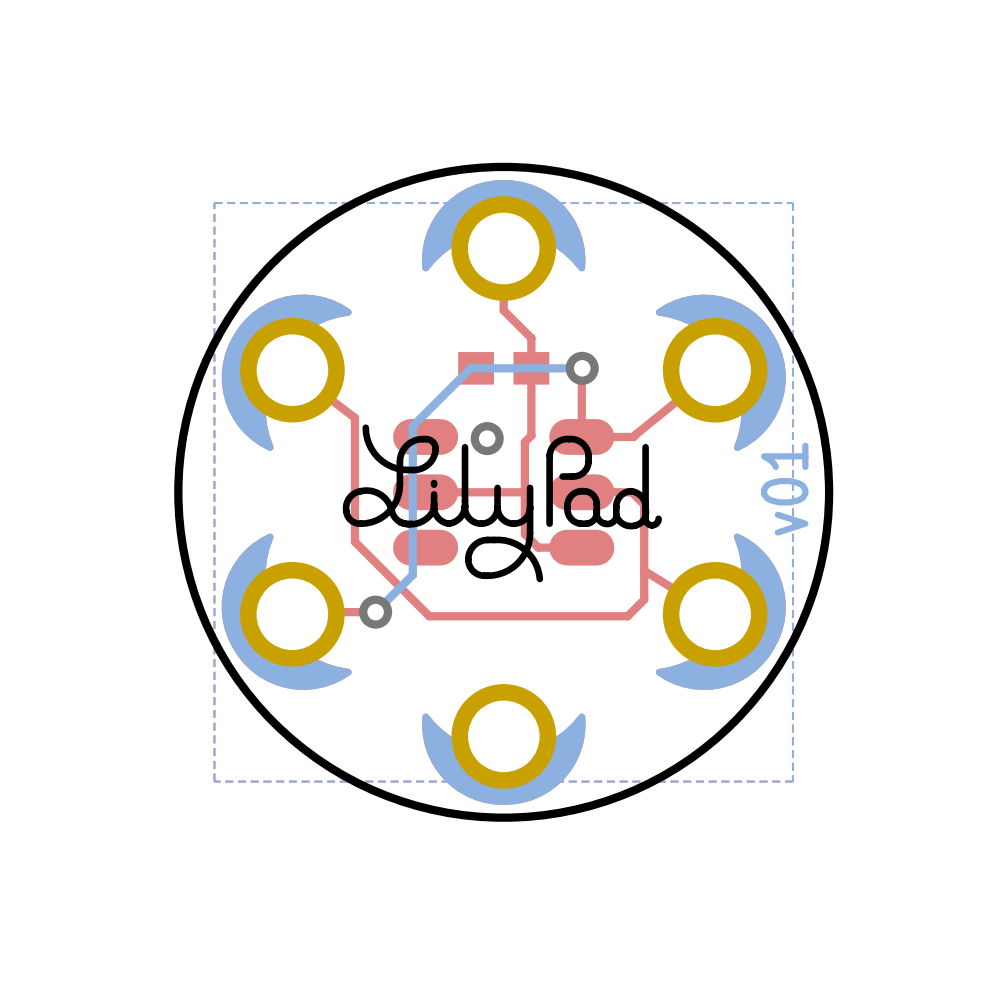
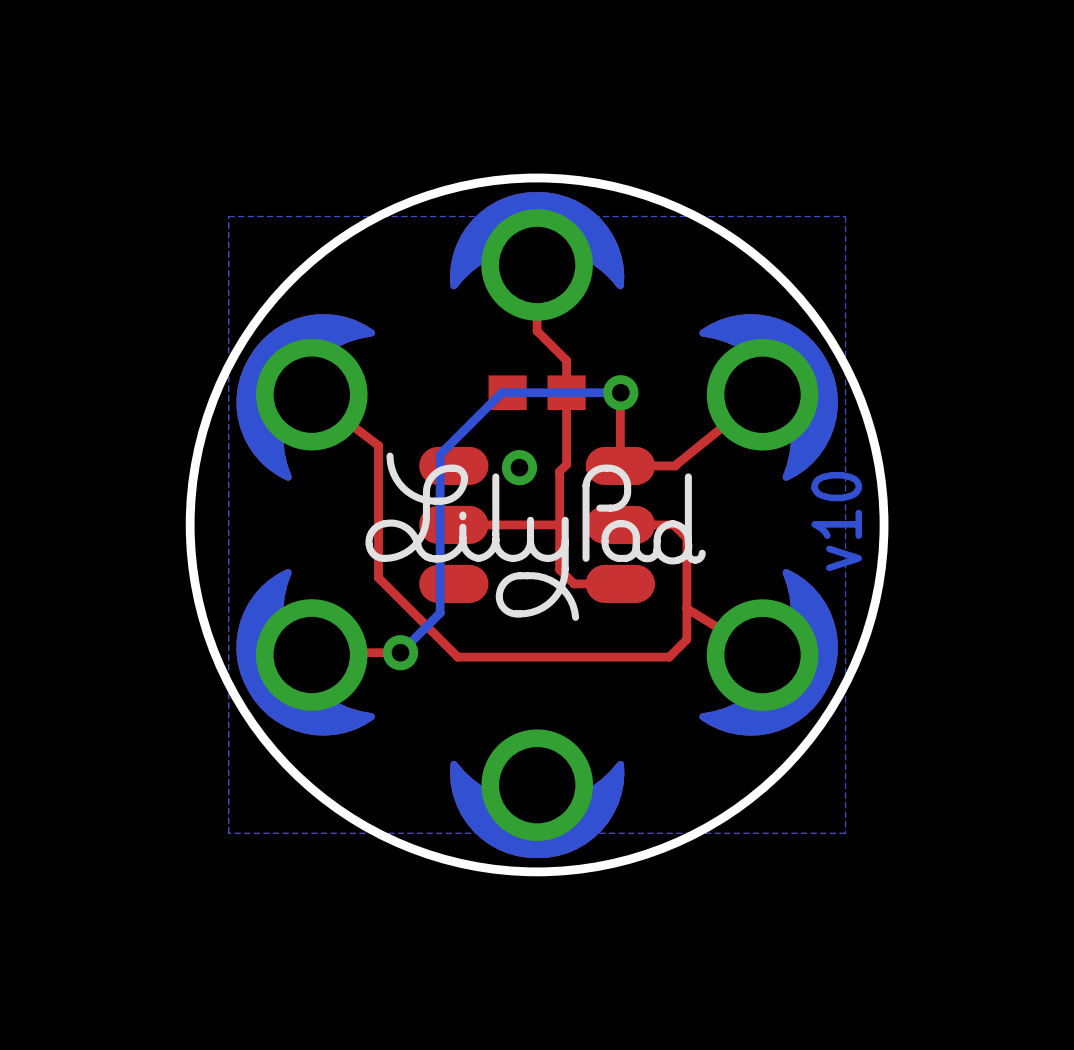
text: v01 (784, 489) -> v10 (836, 521)

